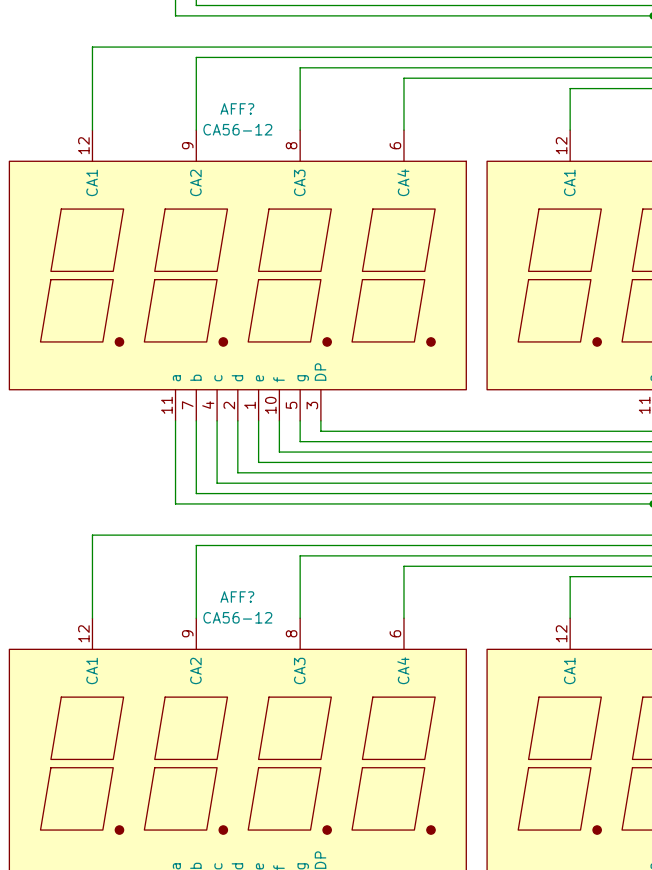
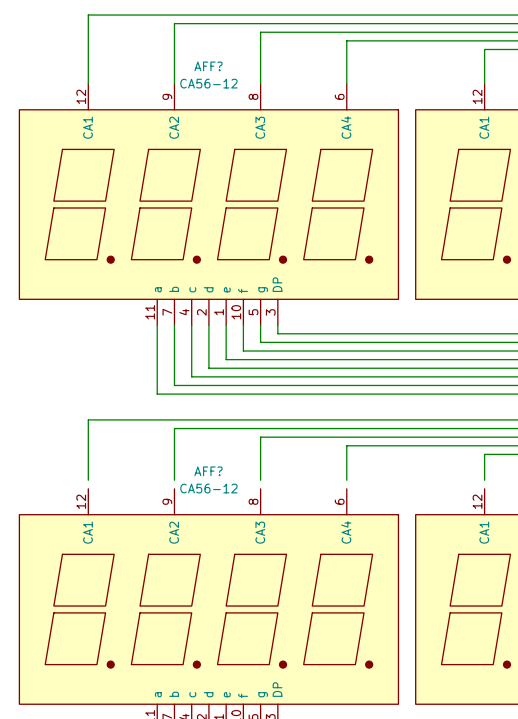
wire: (92, 607) (92, 618) -> none
wire: (196, 607) (196, 618) -> none
wire: (300, 607) (300, 618) -> none
wire: (403, 607) (403, 618) -> none
wire: (570, 607) (570, 618) -> none

